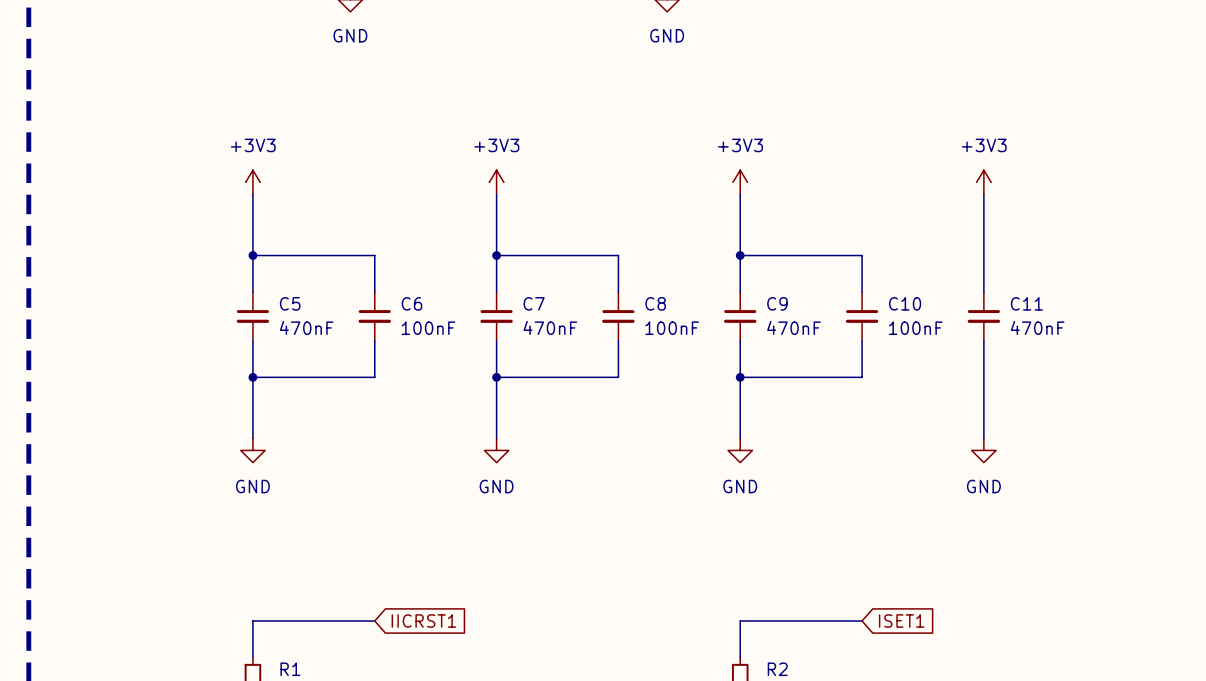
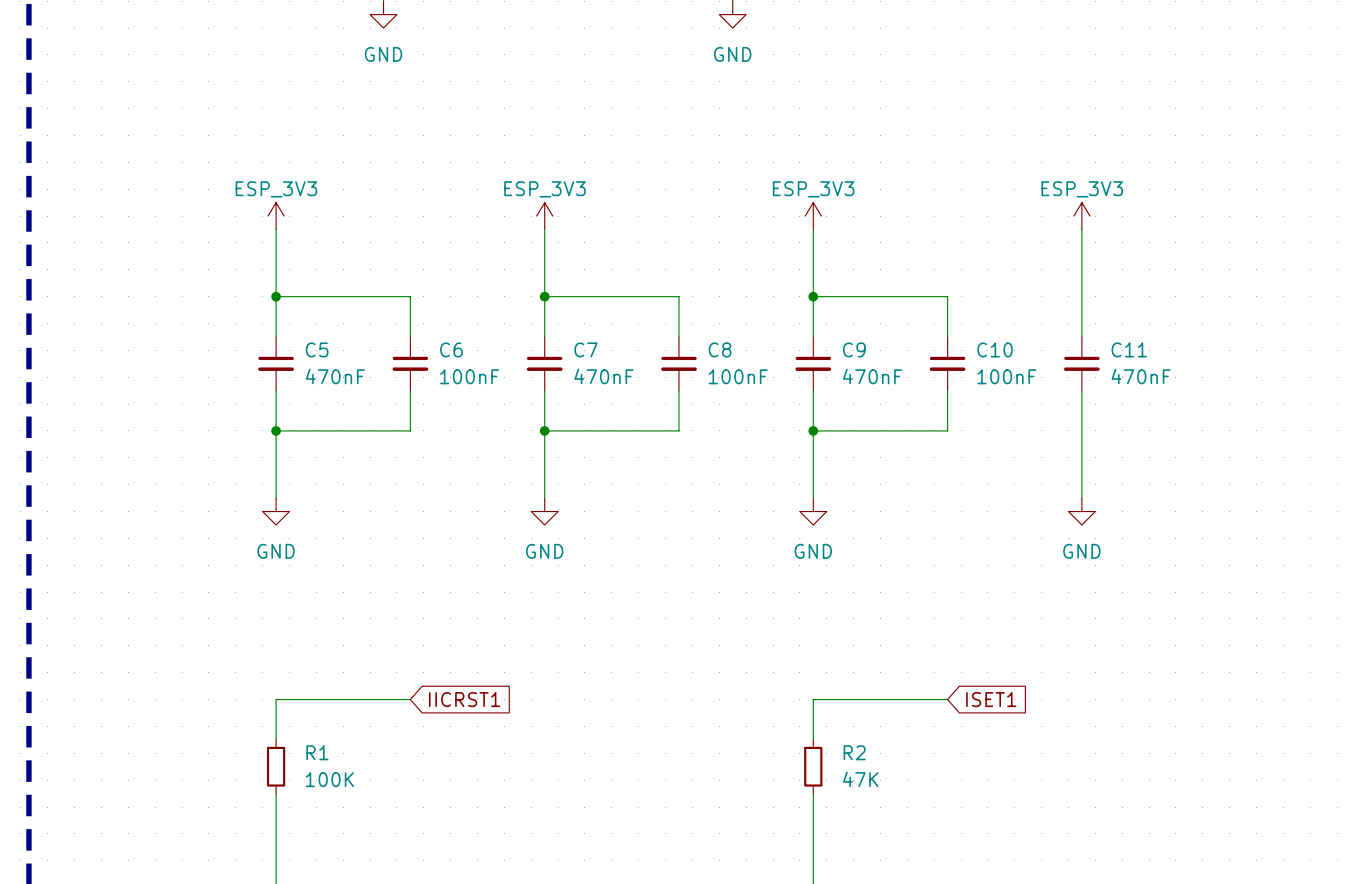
power symbol: +3V3 (252, 182) -> ESP_3V3 (276, 216)
power symbol: +3V3 (496, 182) -> ESP_3V3 (544, 216)
power symbol: +3V3 (740, 182) -> ESP_3V3 (813, 216)
power symbol: +3V3 (983, 182) -> ESP_3V3 (1081, 216)

